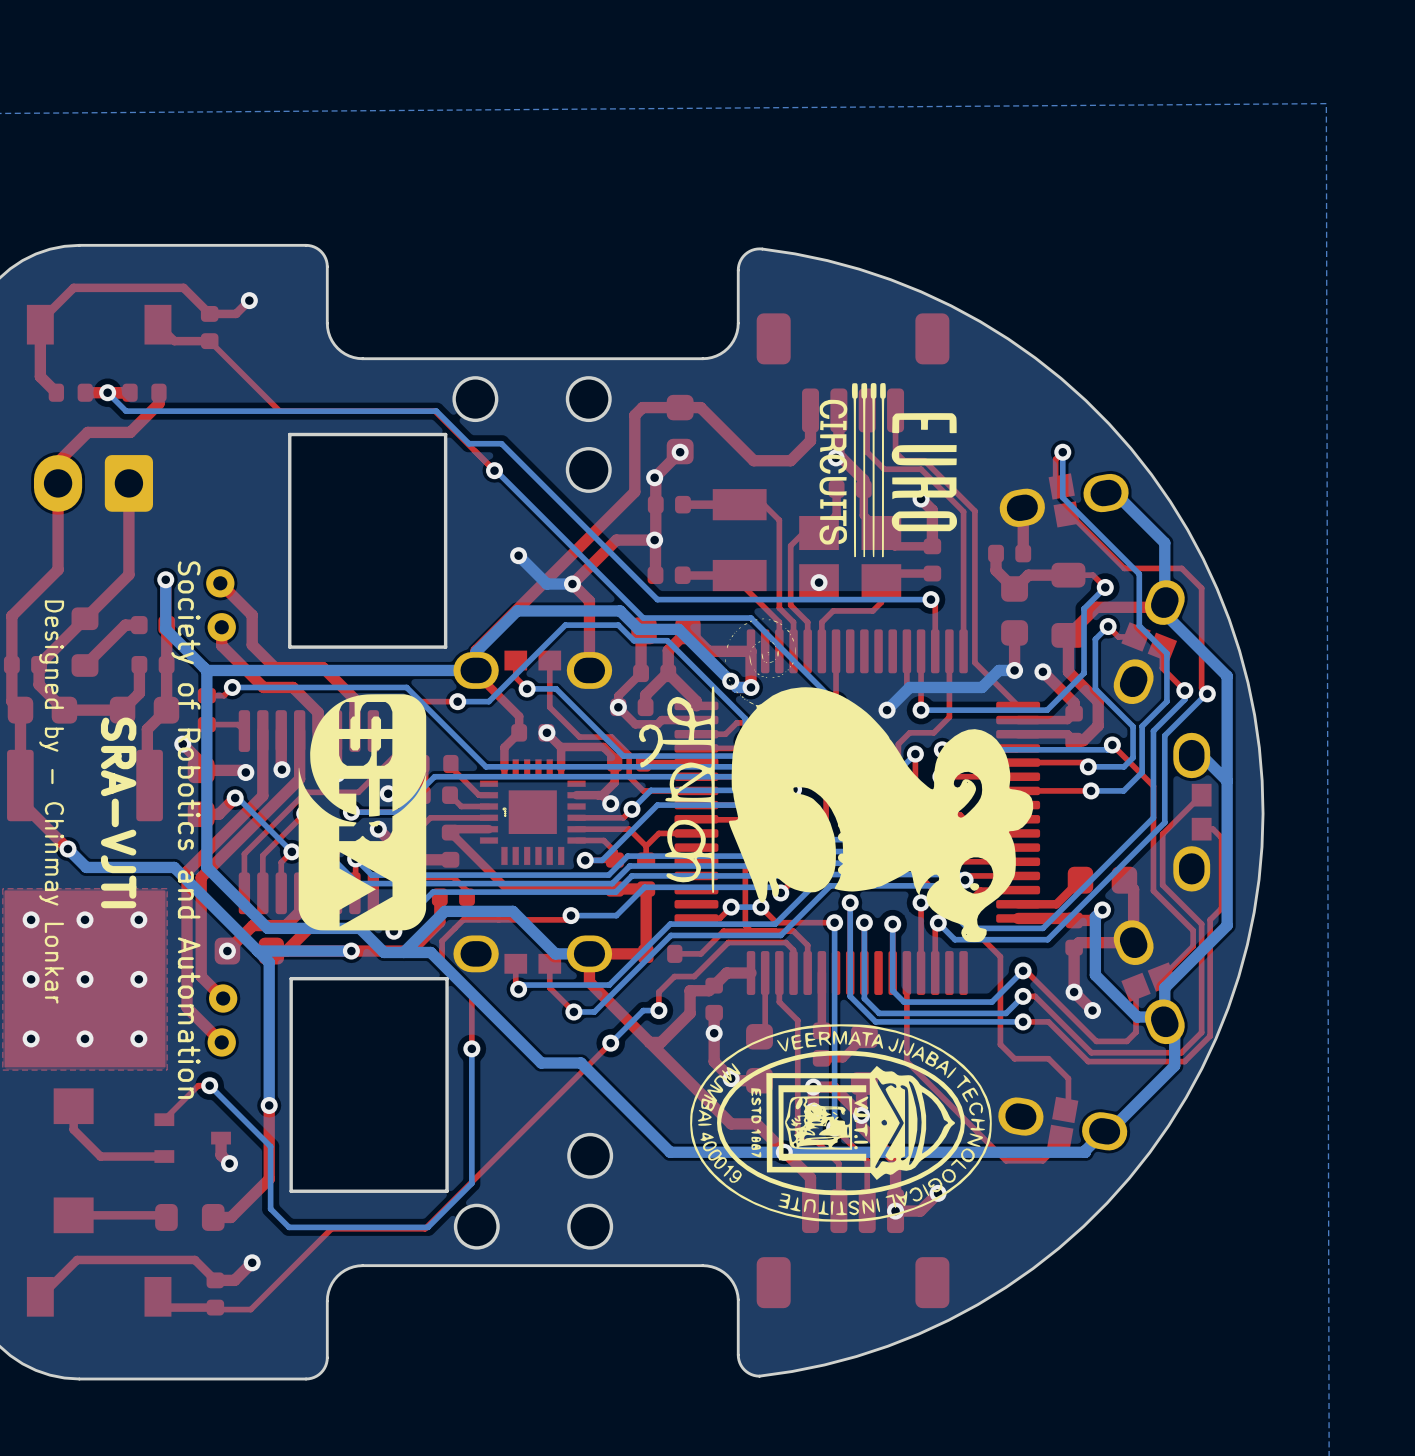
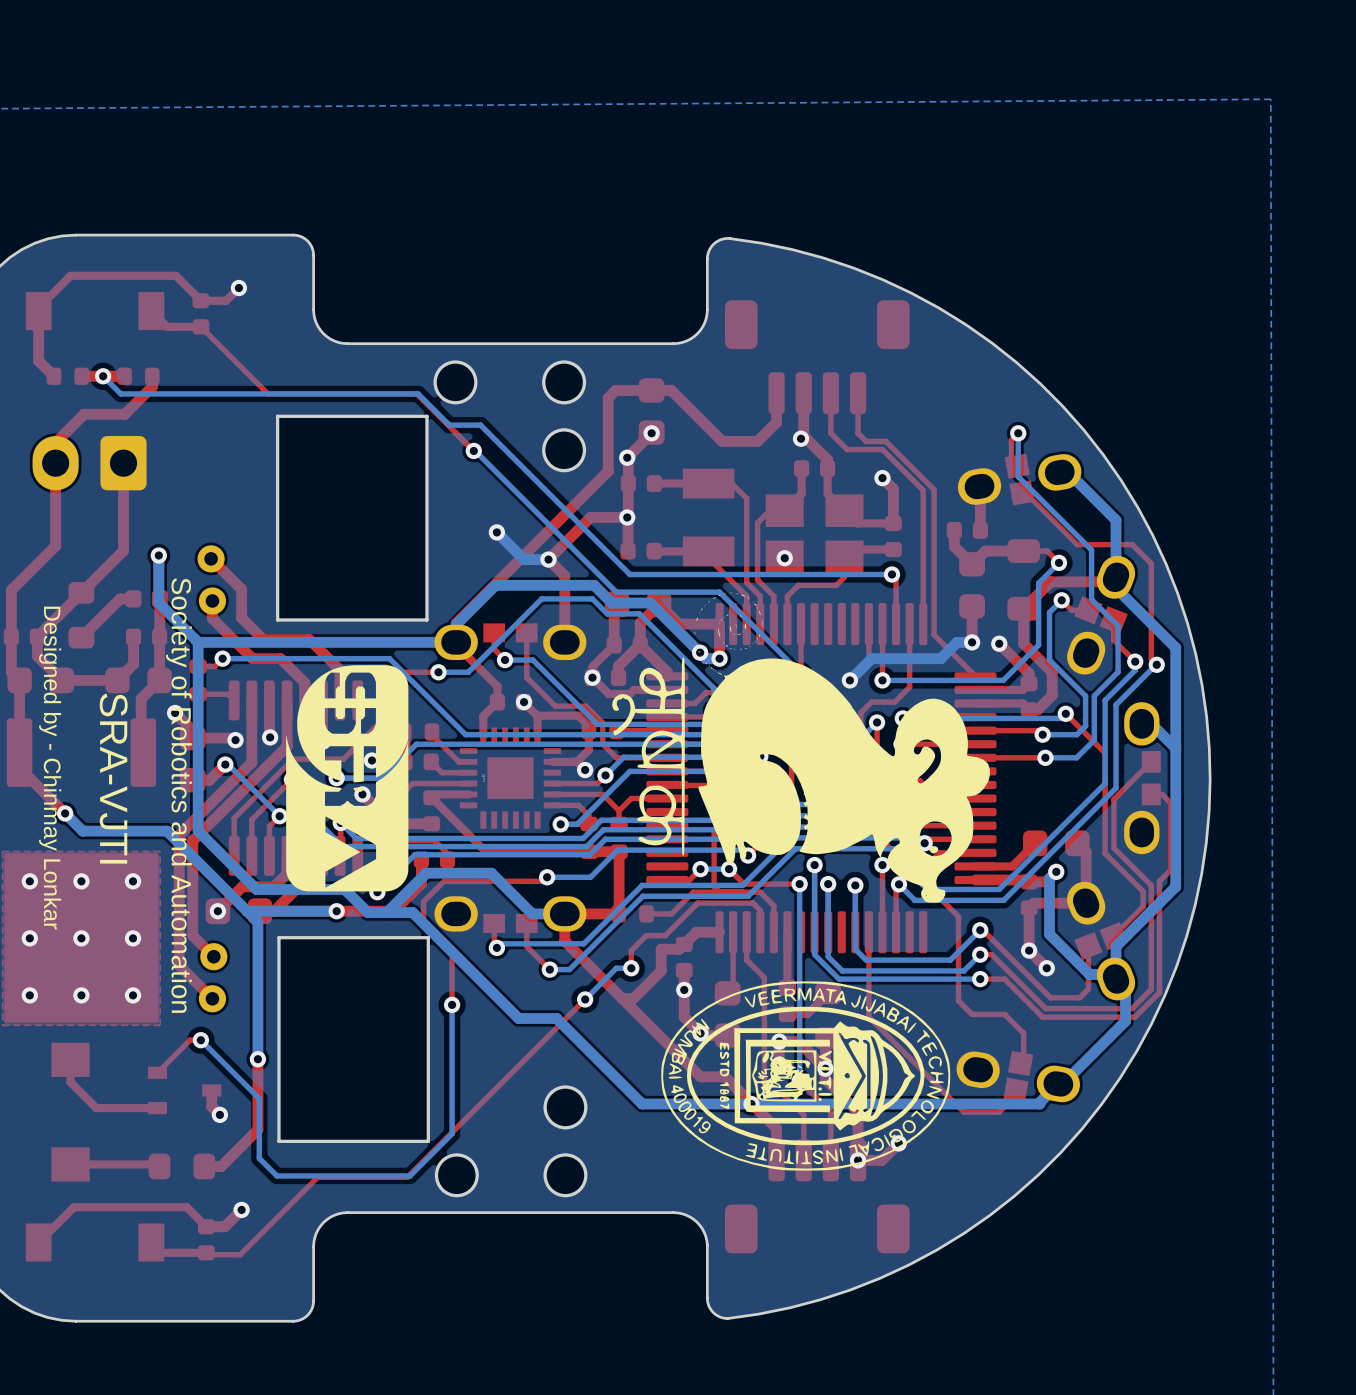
drawing: [819, 382, 958, 558] -> none

